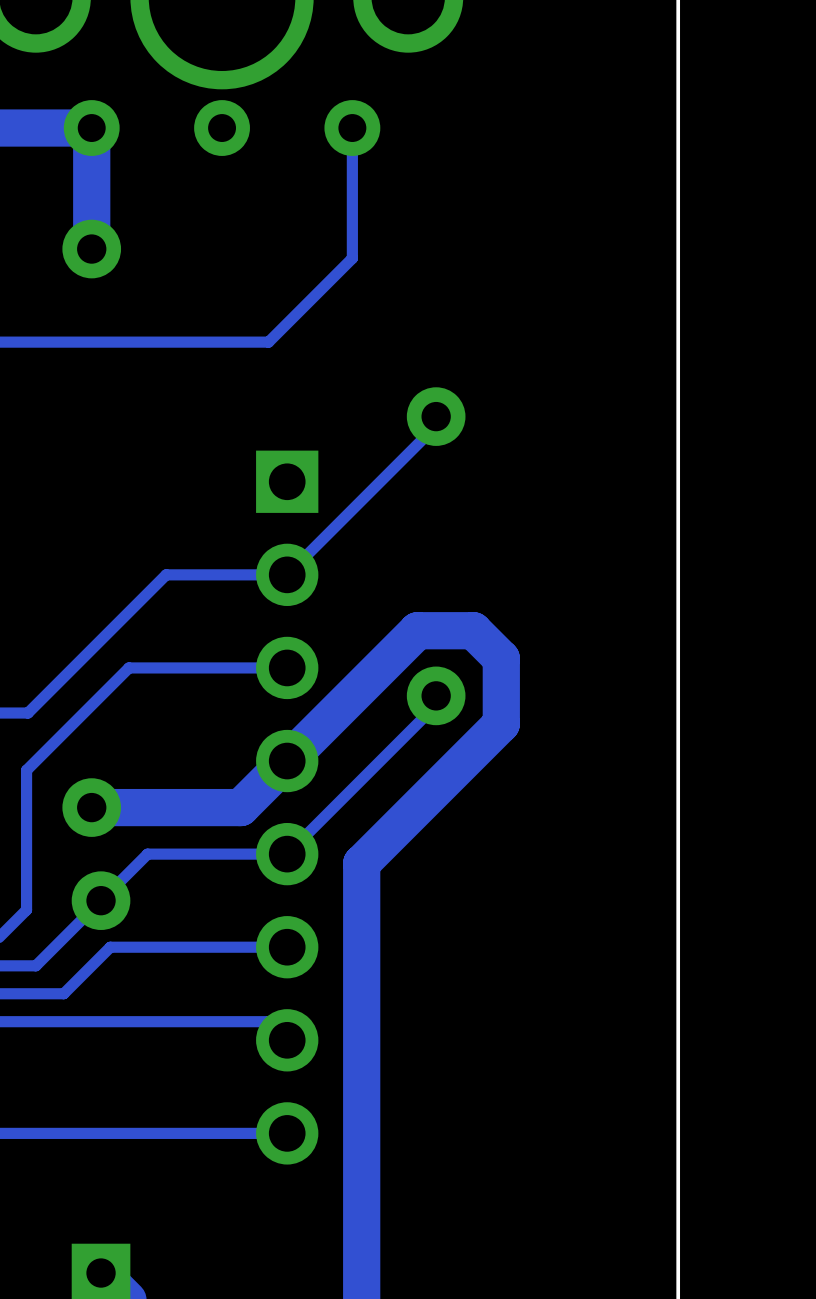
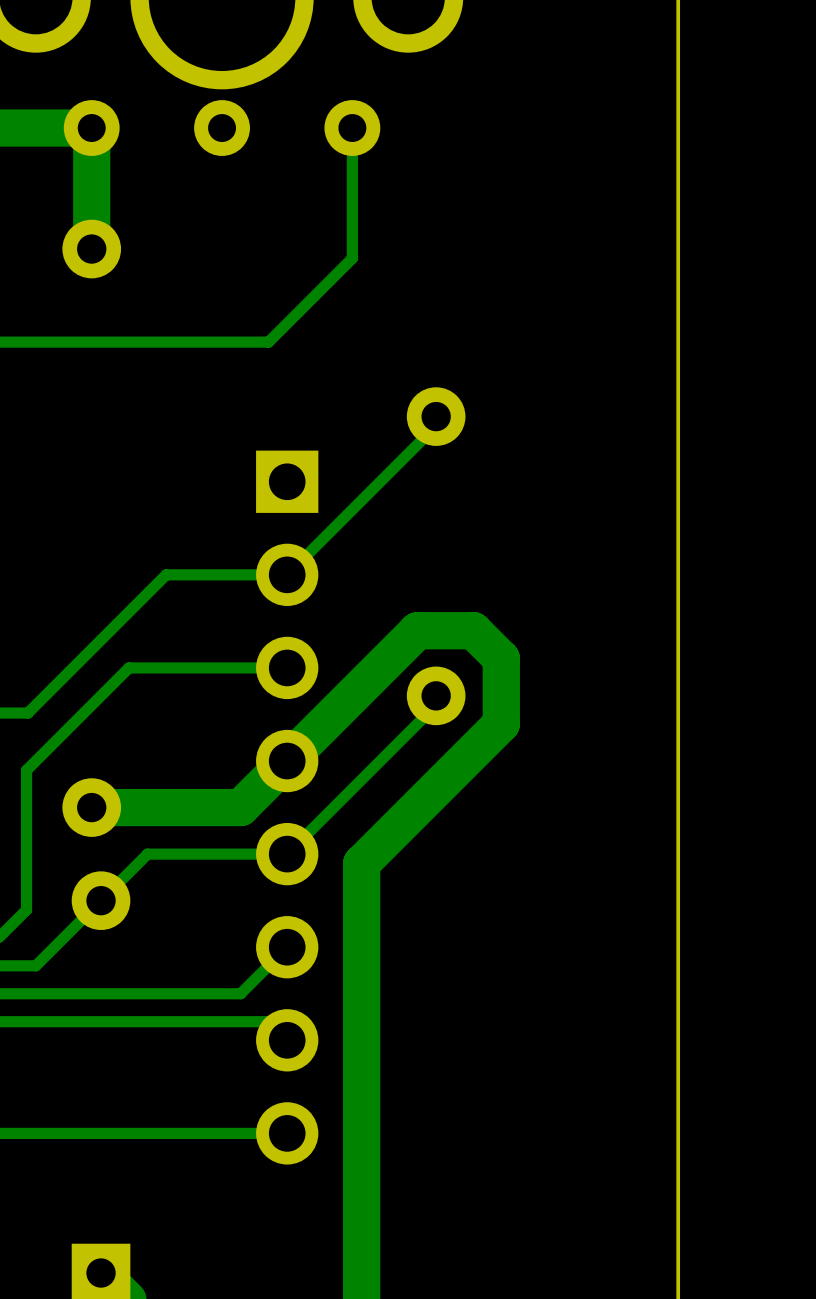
bottom track: (287, 947) (110, 947) (63, 993) -> (287, 947) (240, 993) (63, 993)

